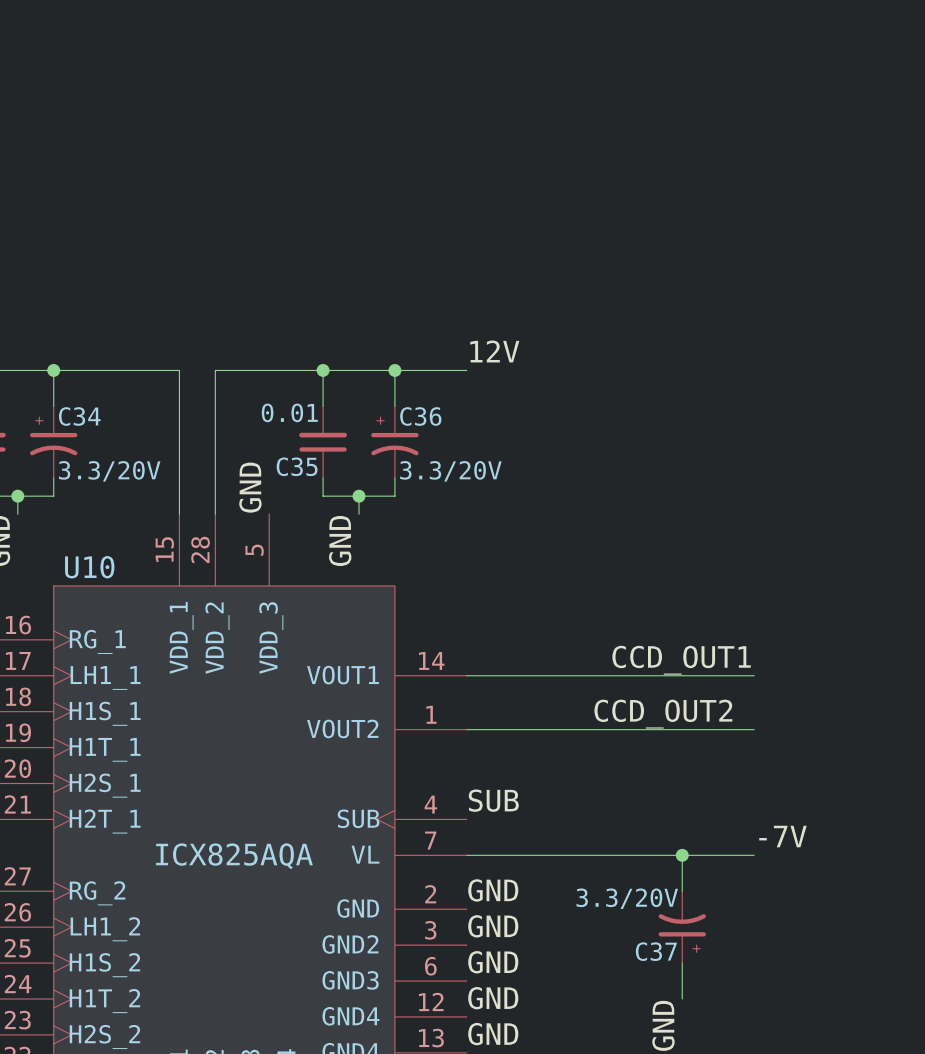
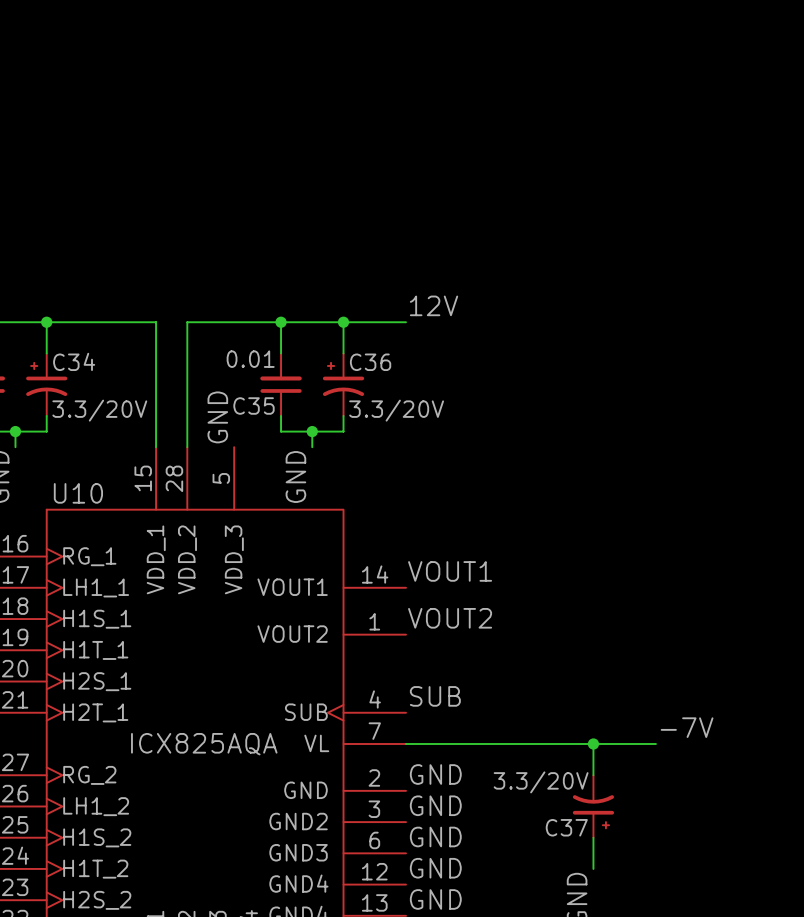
label: none -> VOUT1 (450, 571)
label: CCD_OUT1 (681, 660) -> none
wire: (466, 675) (754, 675) -> none
label: none -> VOUT2 (450, 618)
label: CCD_OUT2 (663, 714) -> none
wire: (466, 729) (754, 729) -> none

